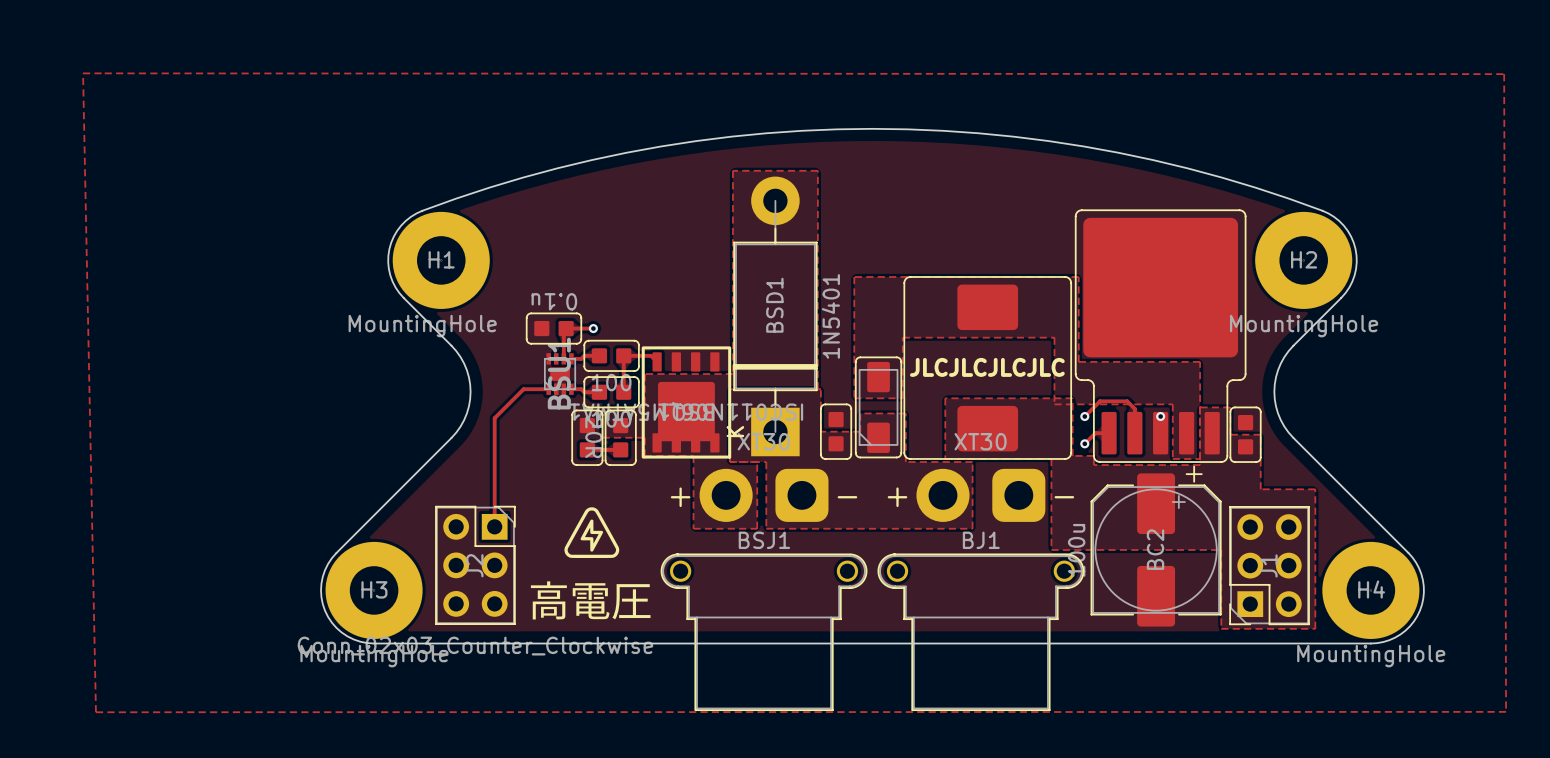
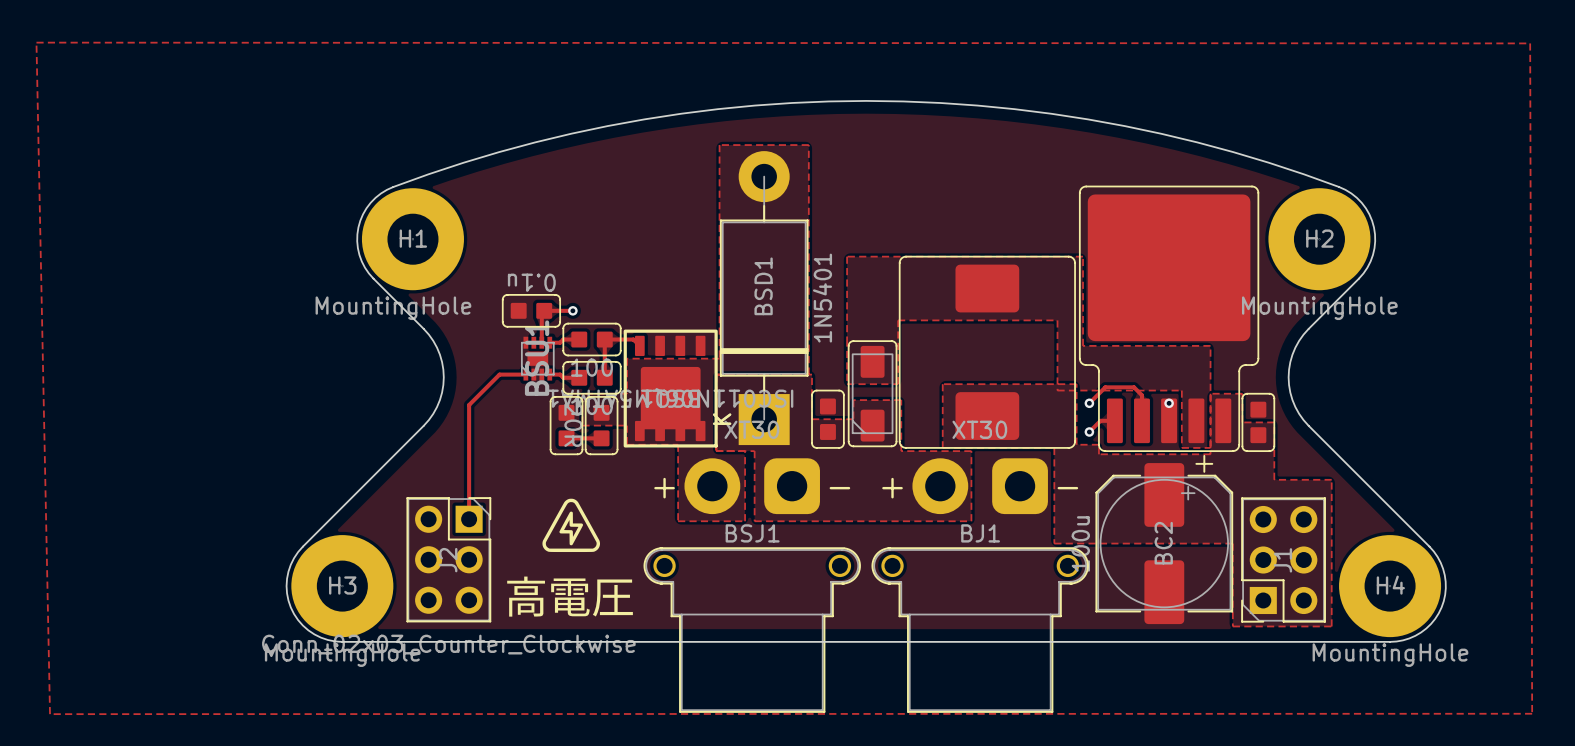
text: JLCJLCJLCJLC (987, 367) -> none

